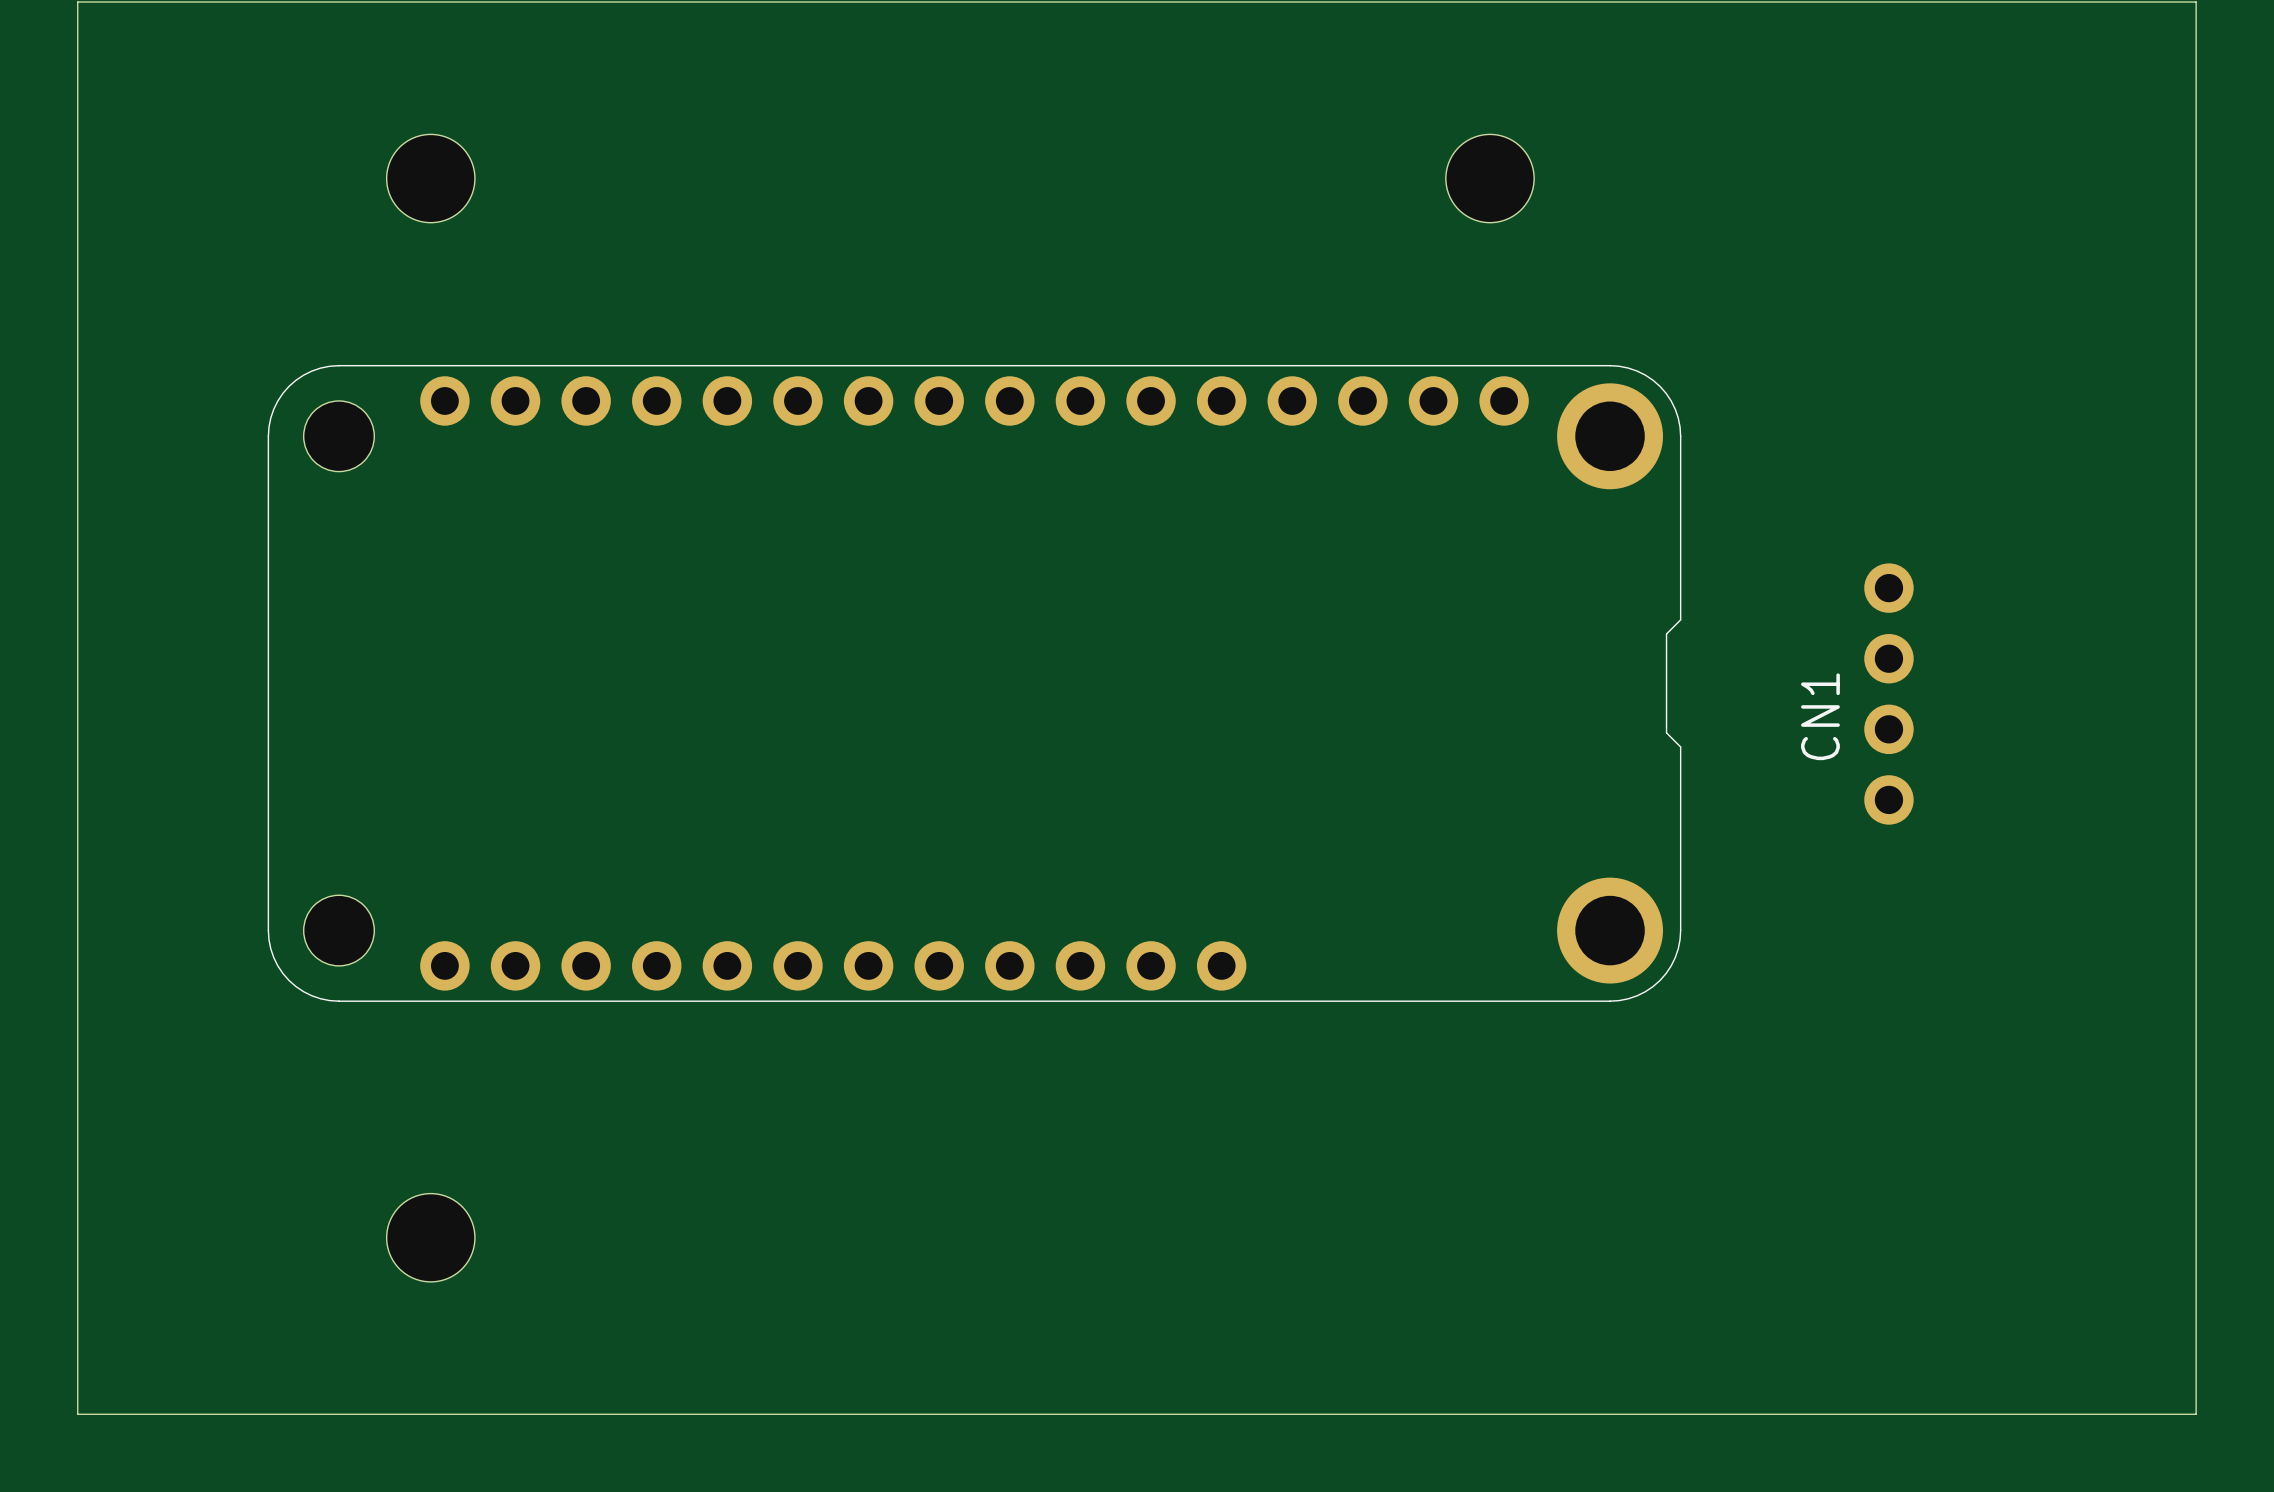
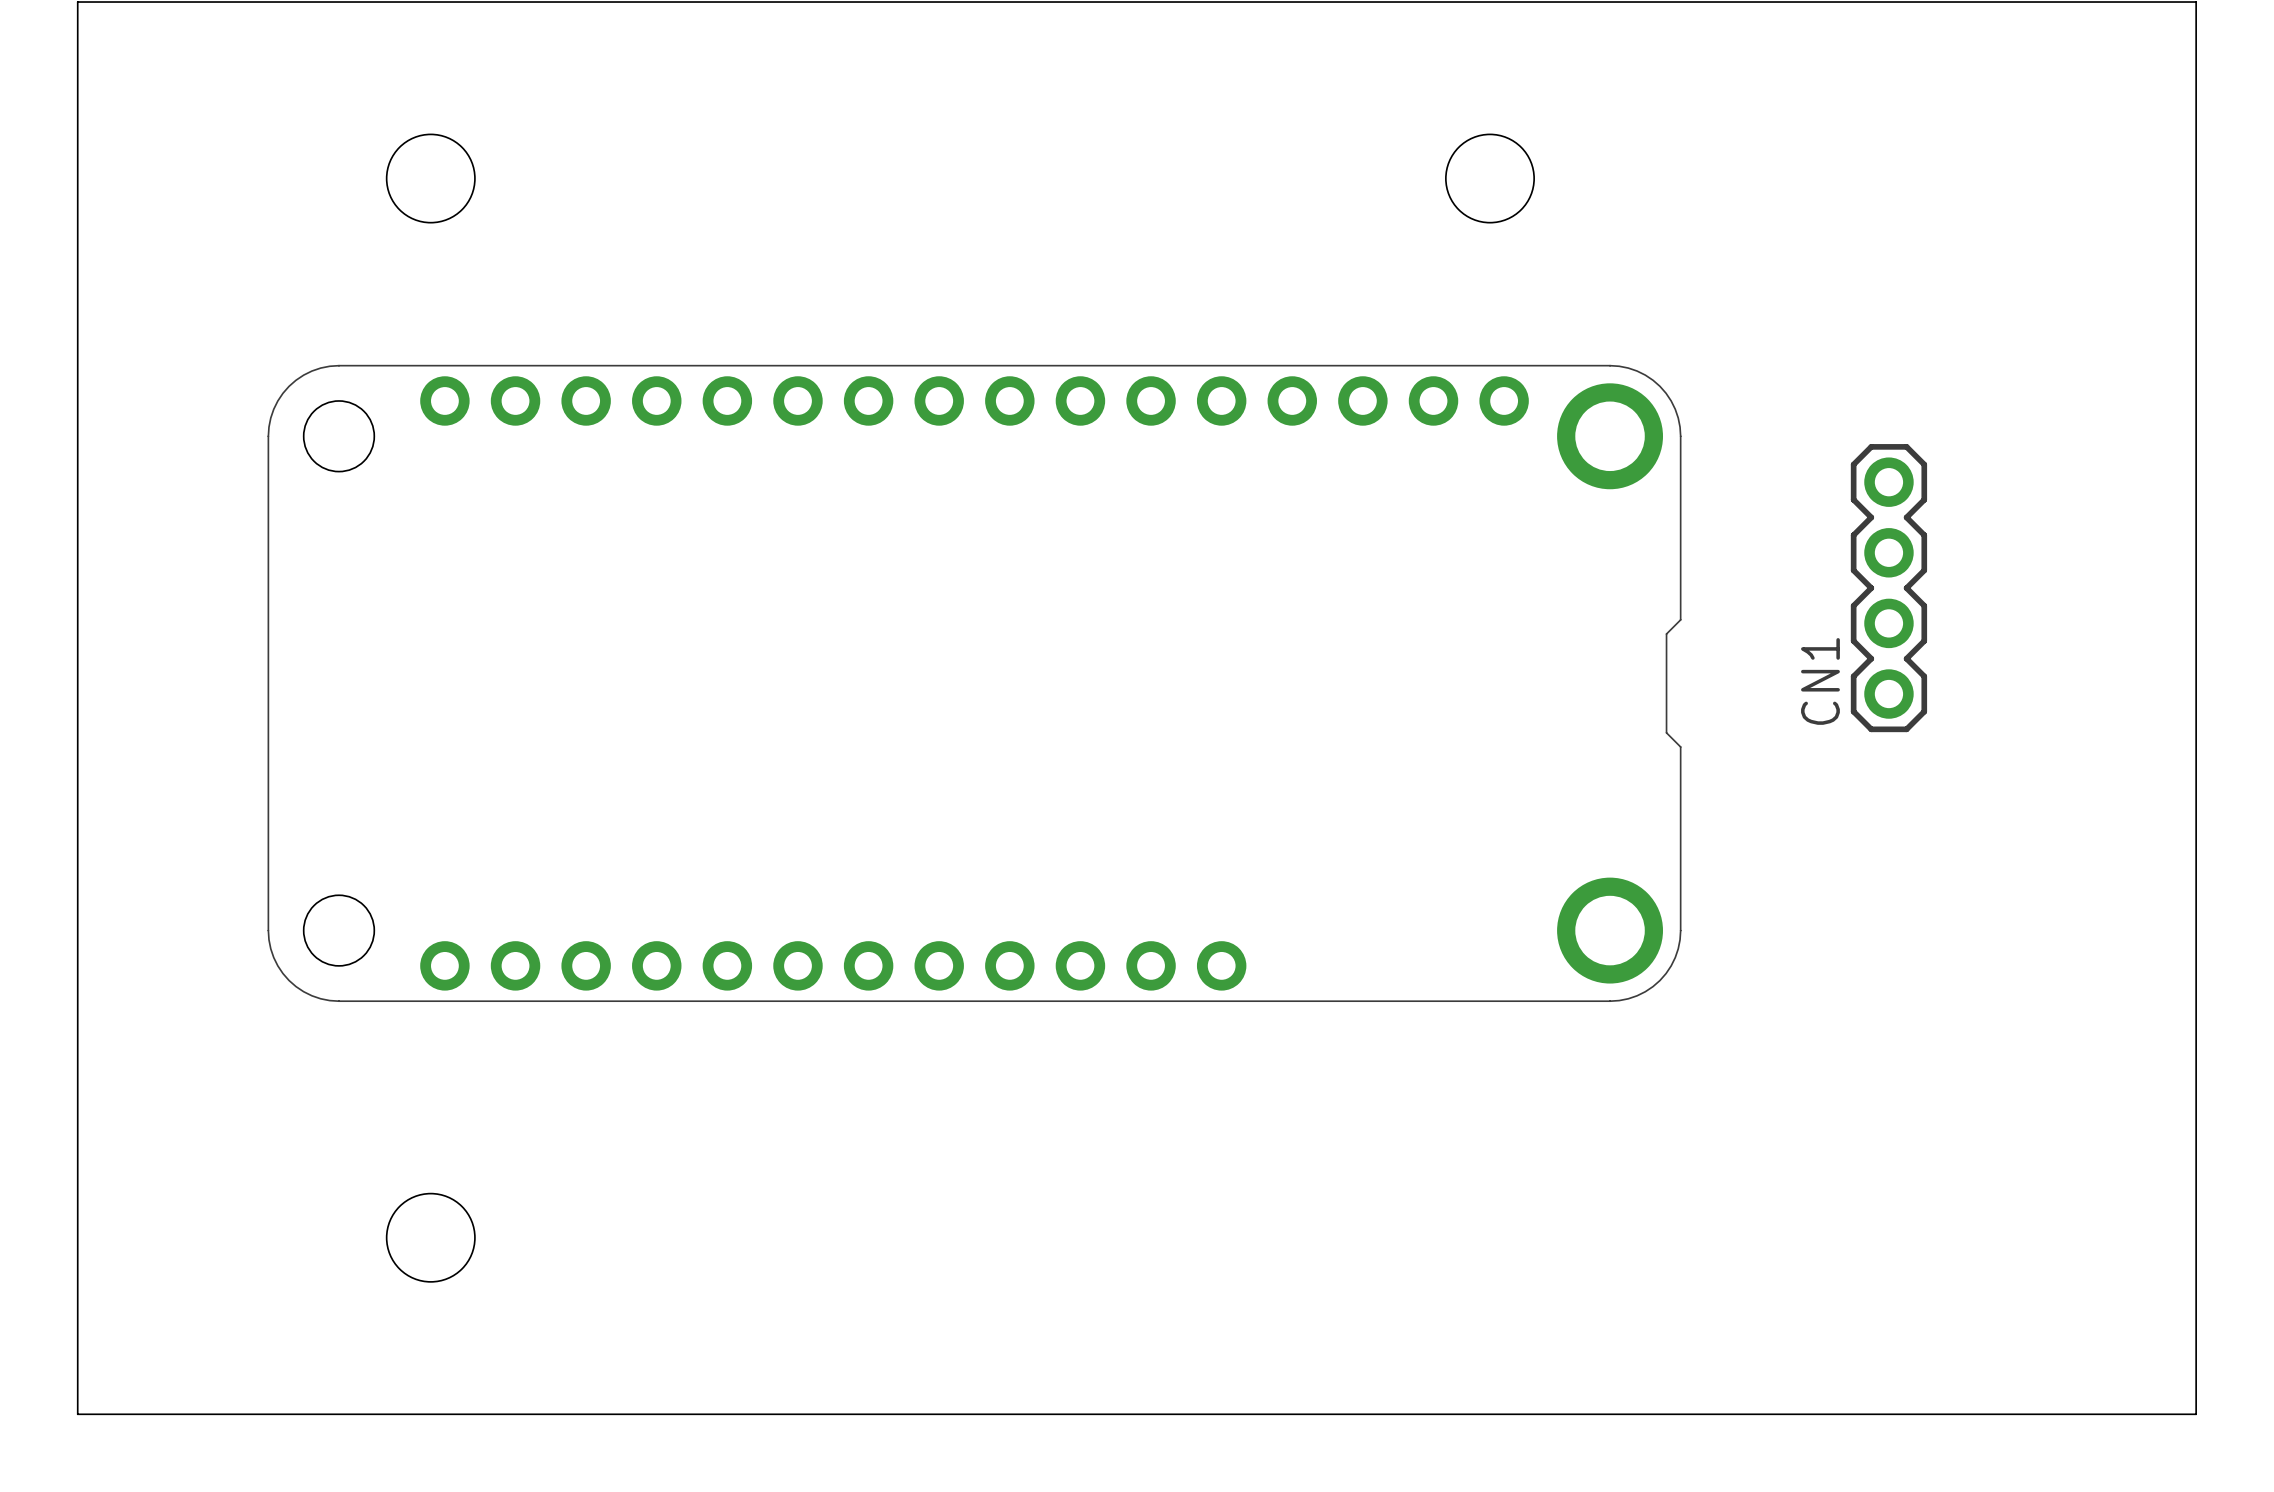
CN1 footprint: [1864, 563, 1914, 825] -> [1850, 444, 1928, 733]
CN1 name position: CN1 (1820, 716) -> CN1 (1820, 681)

